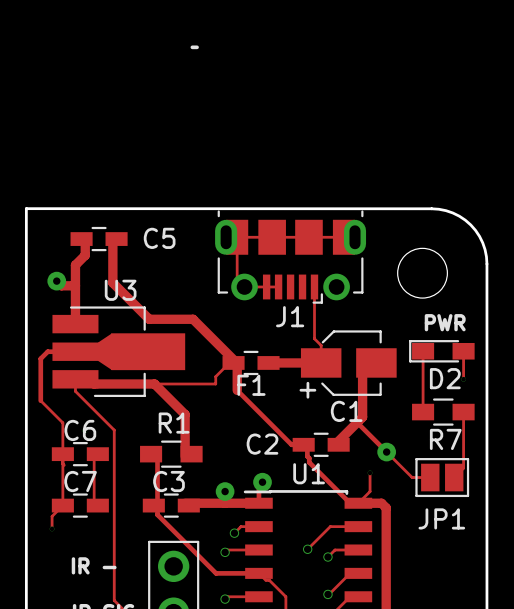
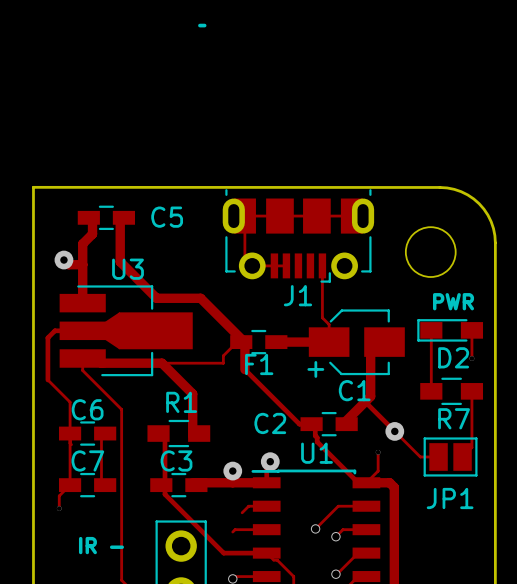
via: (234, 533) -> none
via: (225, 552) -> none

